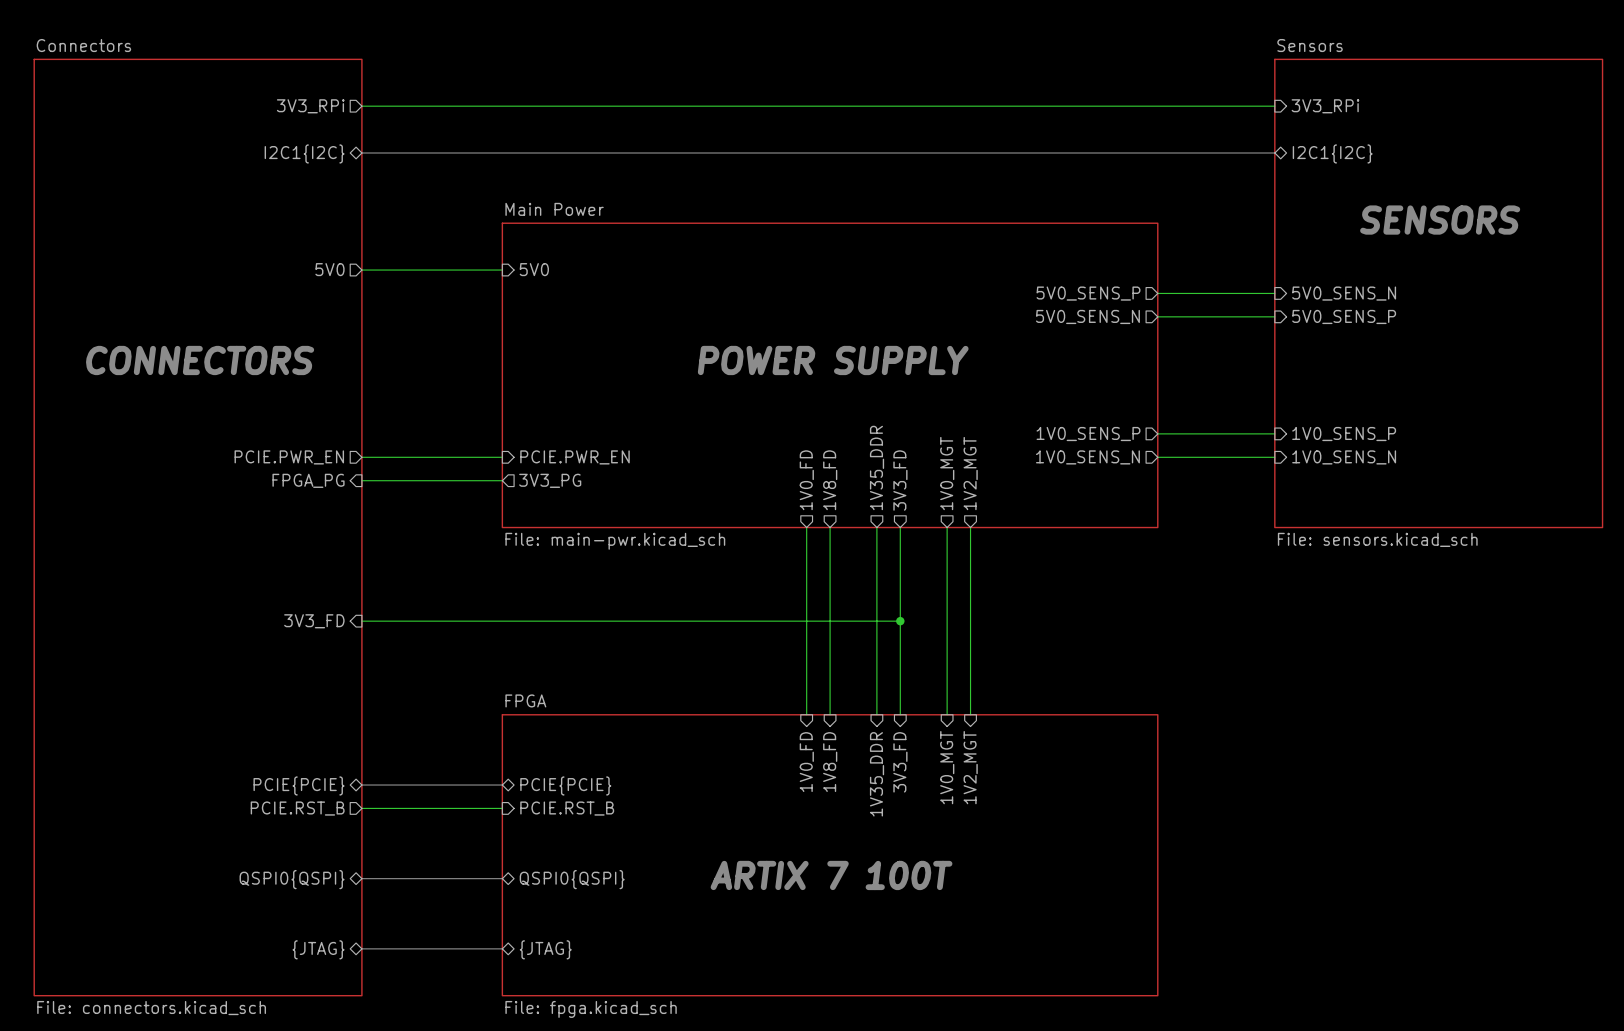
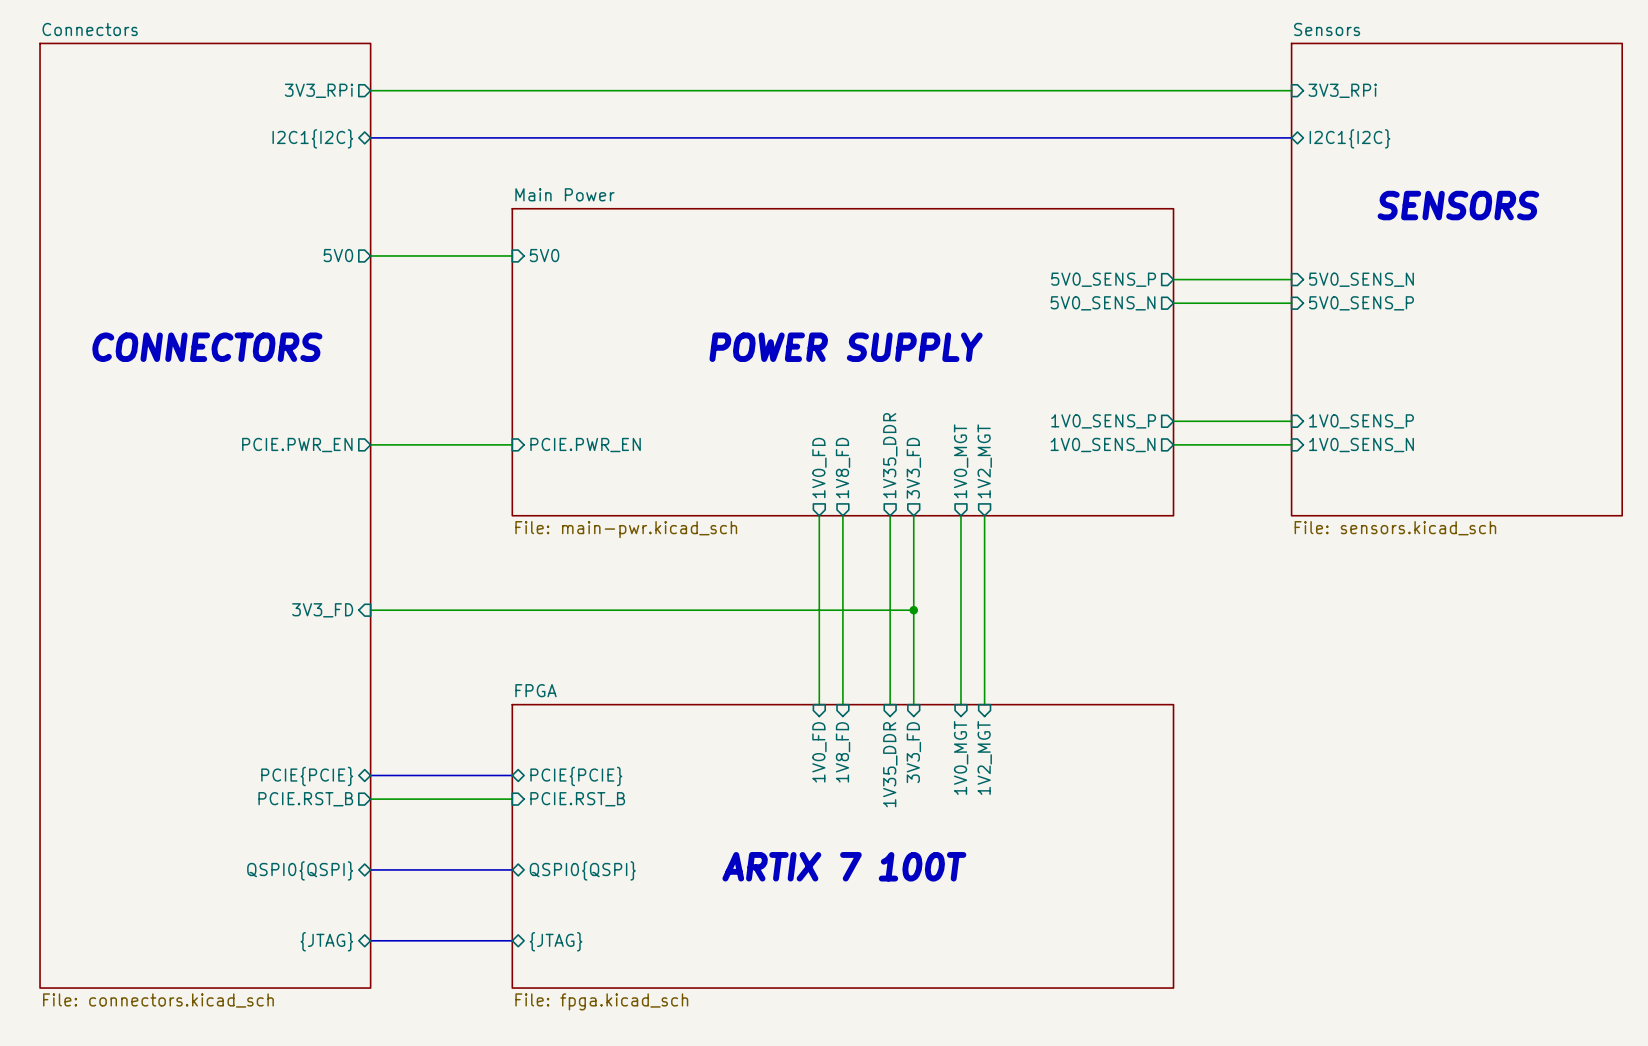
sheet pin: FPGA_PG (308, 480) -> none
wire: (361, 480) (502, 480) -> none
sheet pin: 3V3_PG (550, 480) -> none

